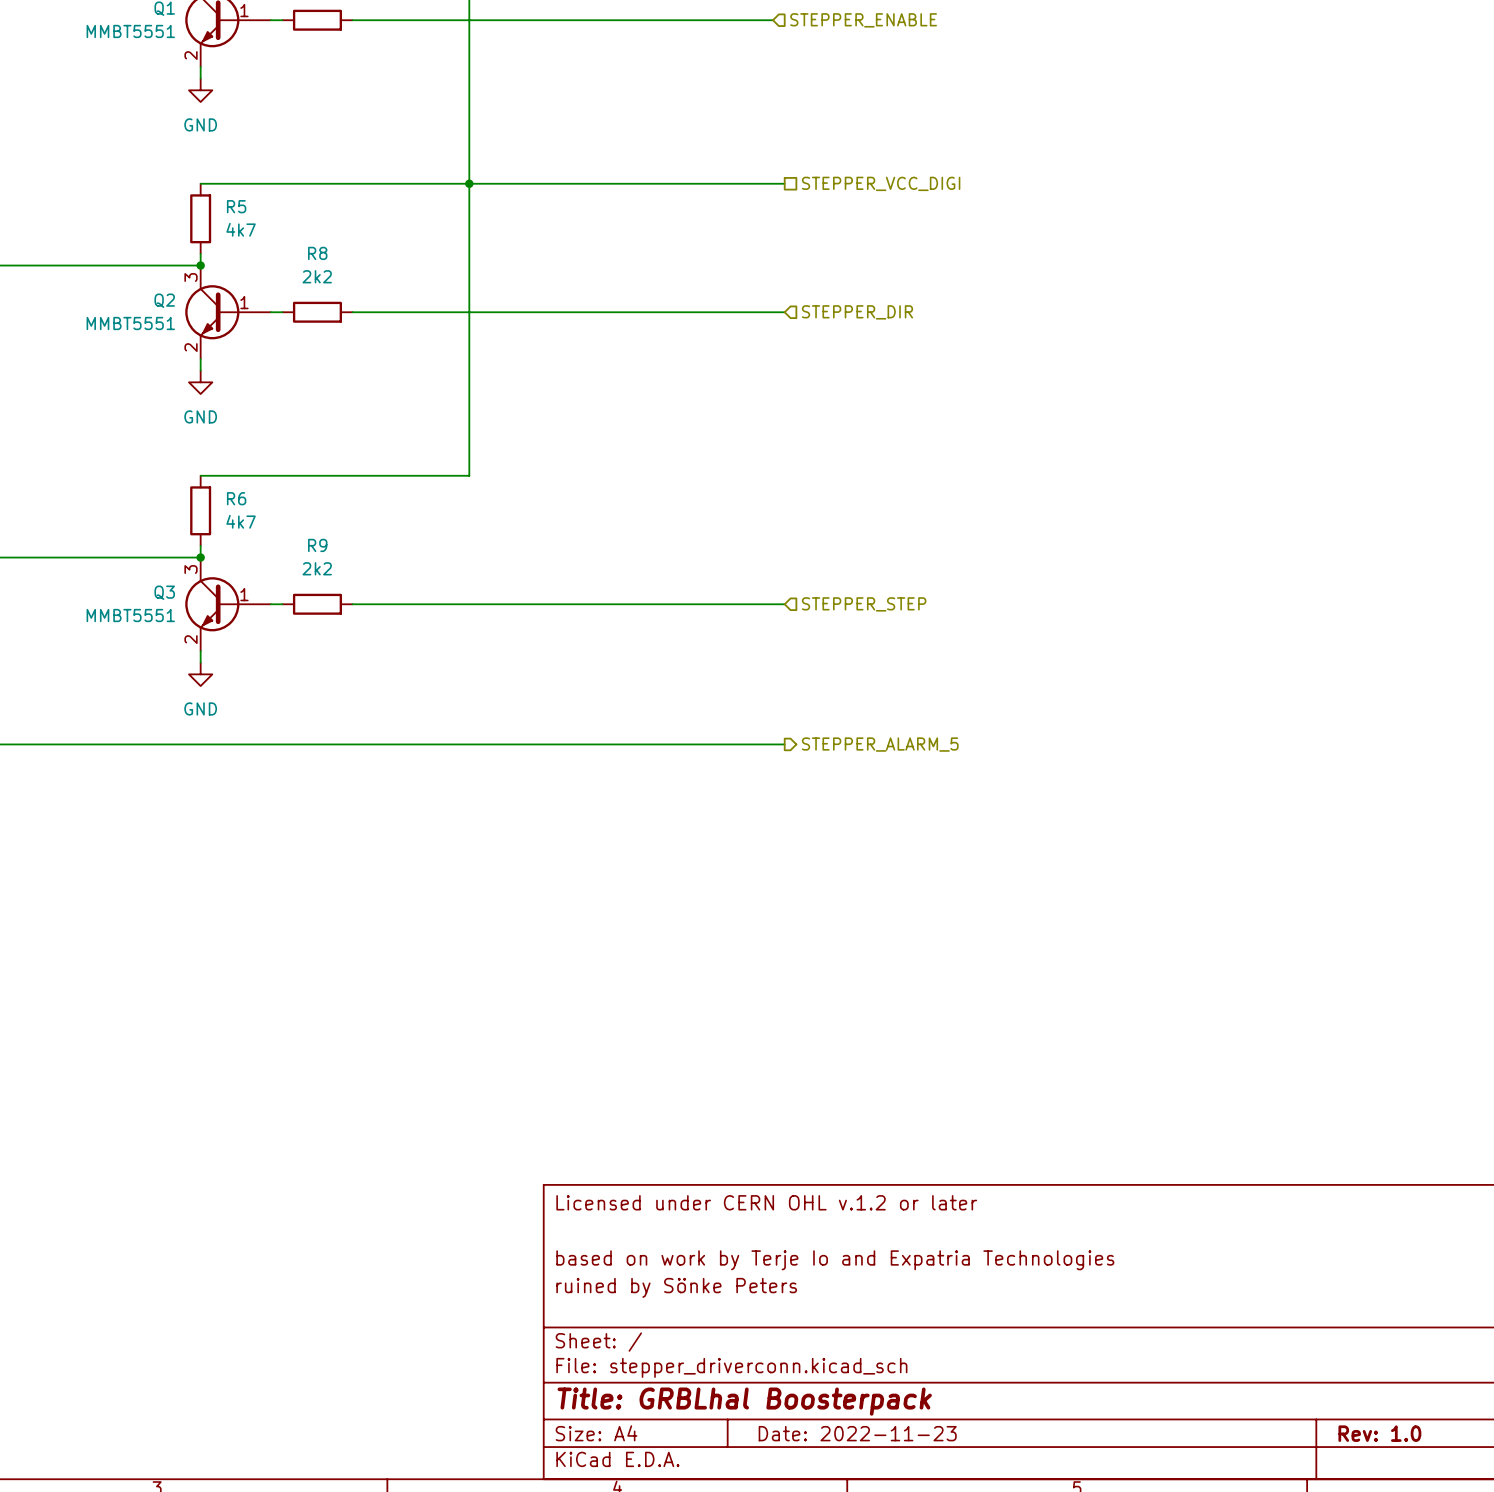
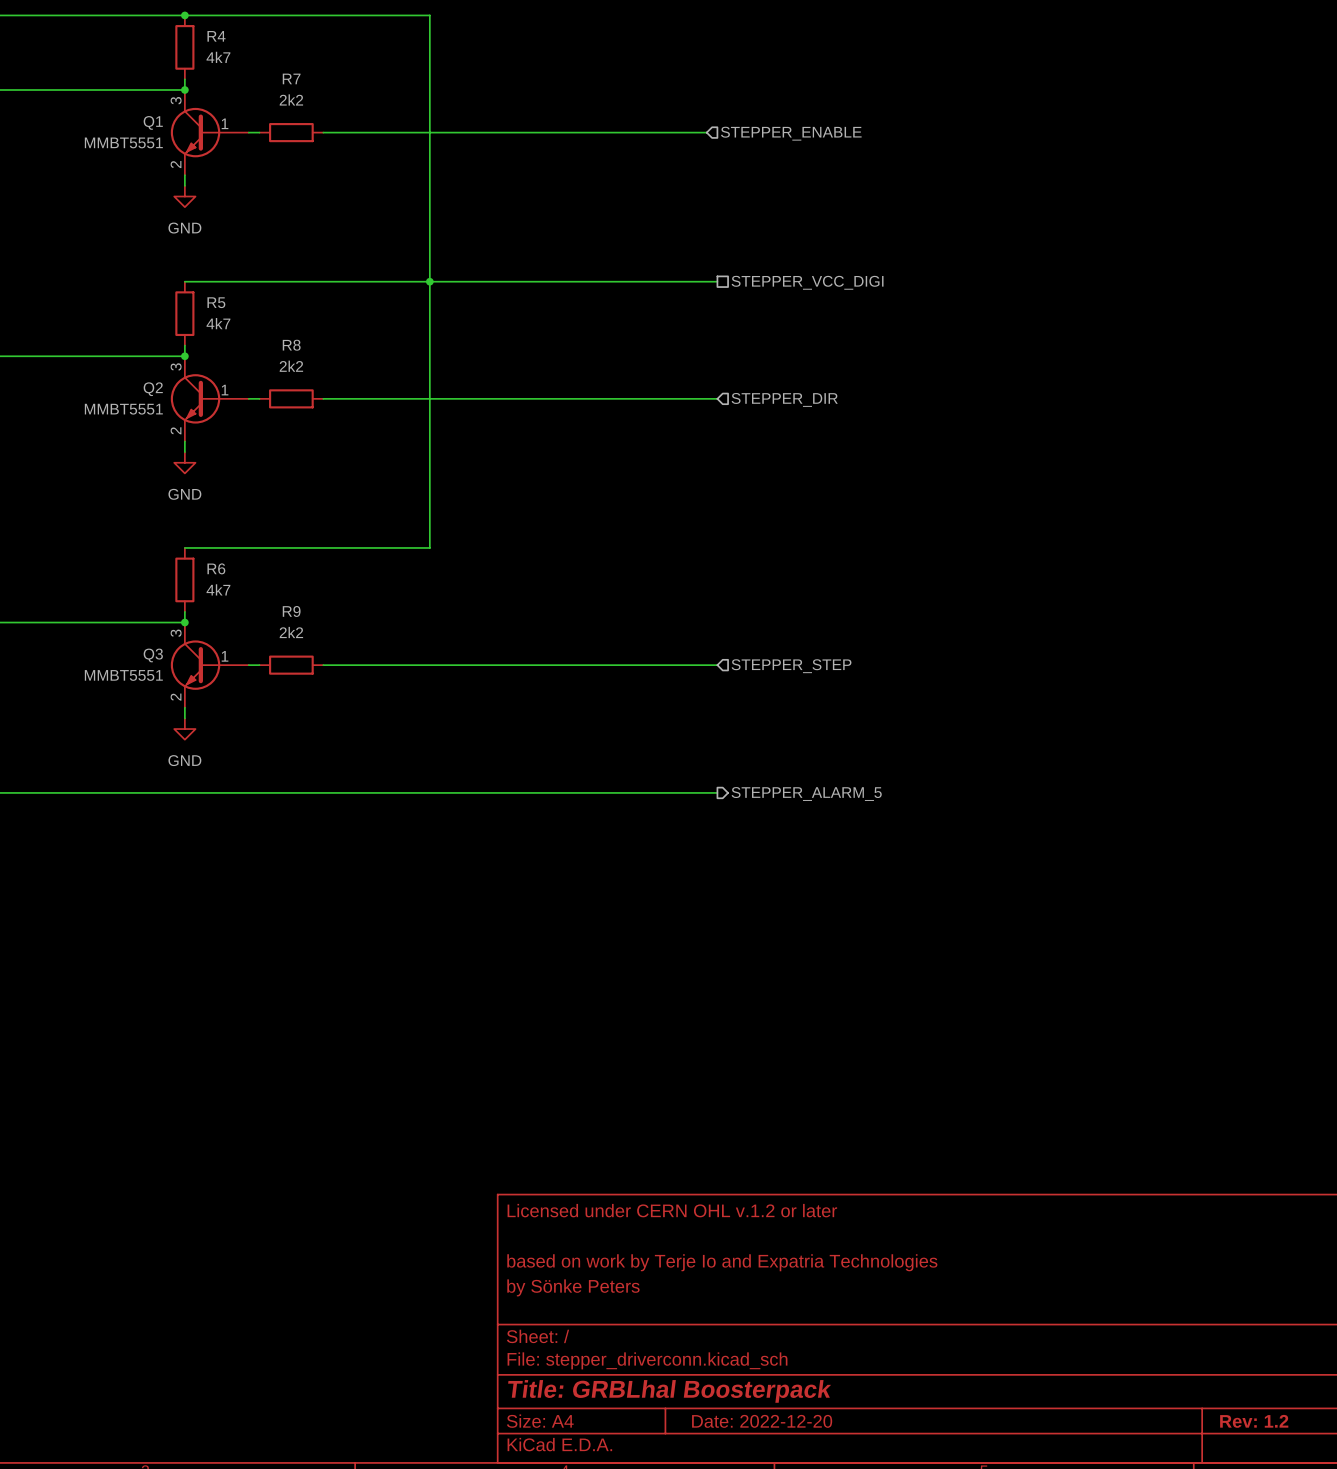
title block: ruined by Sönke Peters (676, 1287) -> by Sönke Peters (573, 1287)
title block: Date: 2022-11-23 (857, 1433) -> Date: 2022-12-20 (762, 1421)
title block: Rev: 1.0 (1379, 1433) -> Rev: 1.2 (1254, 1421)

